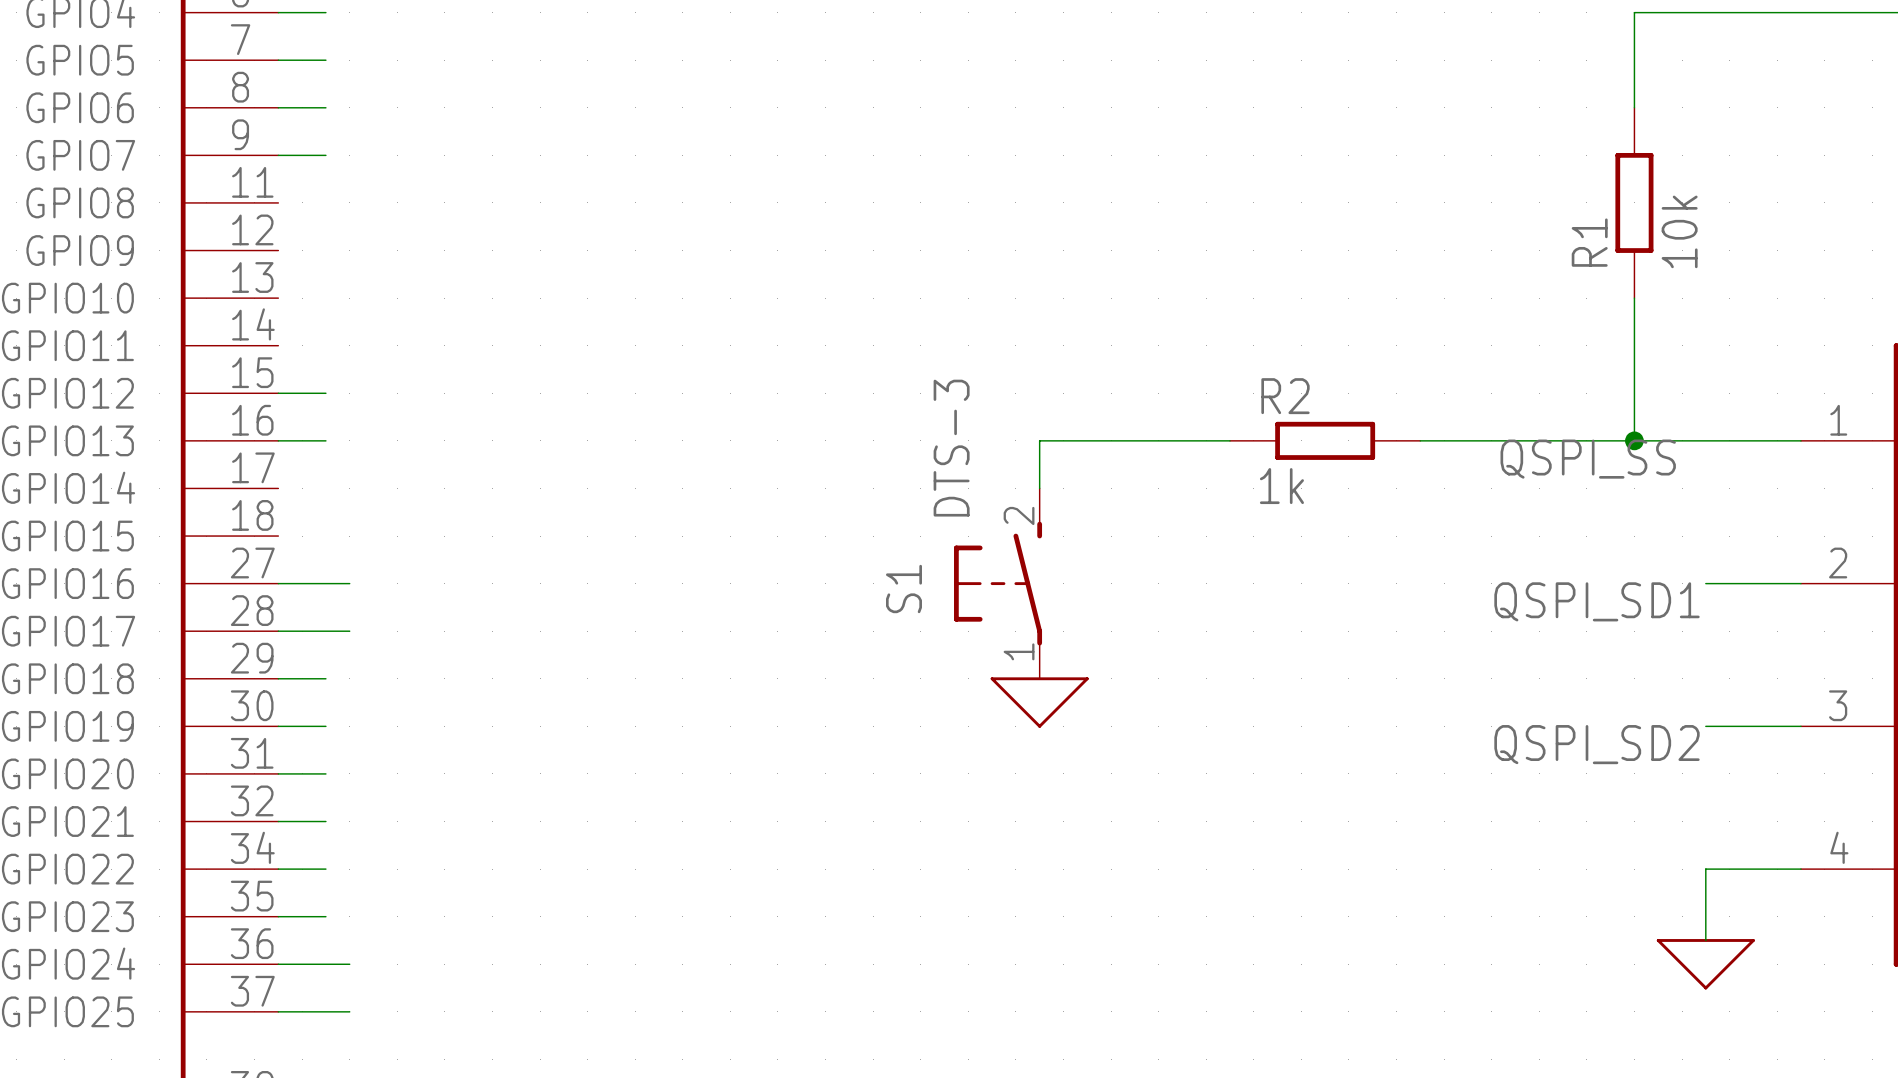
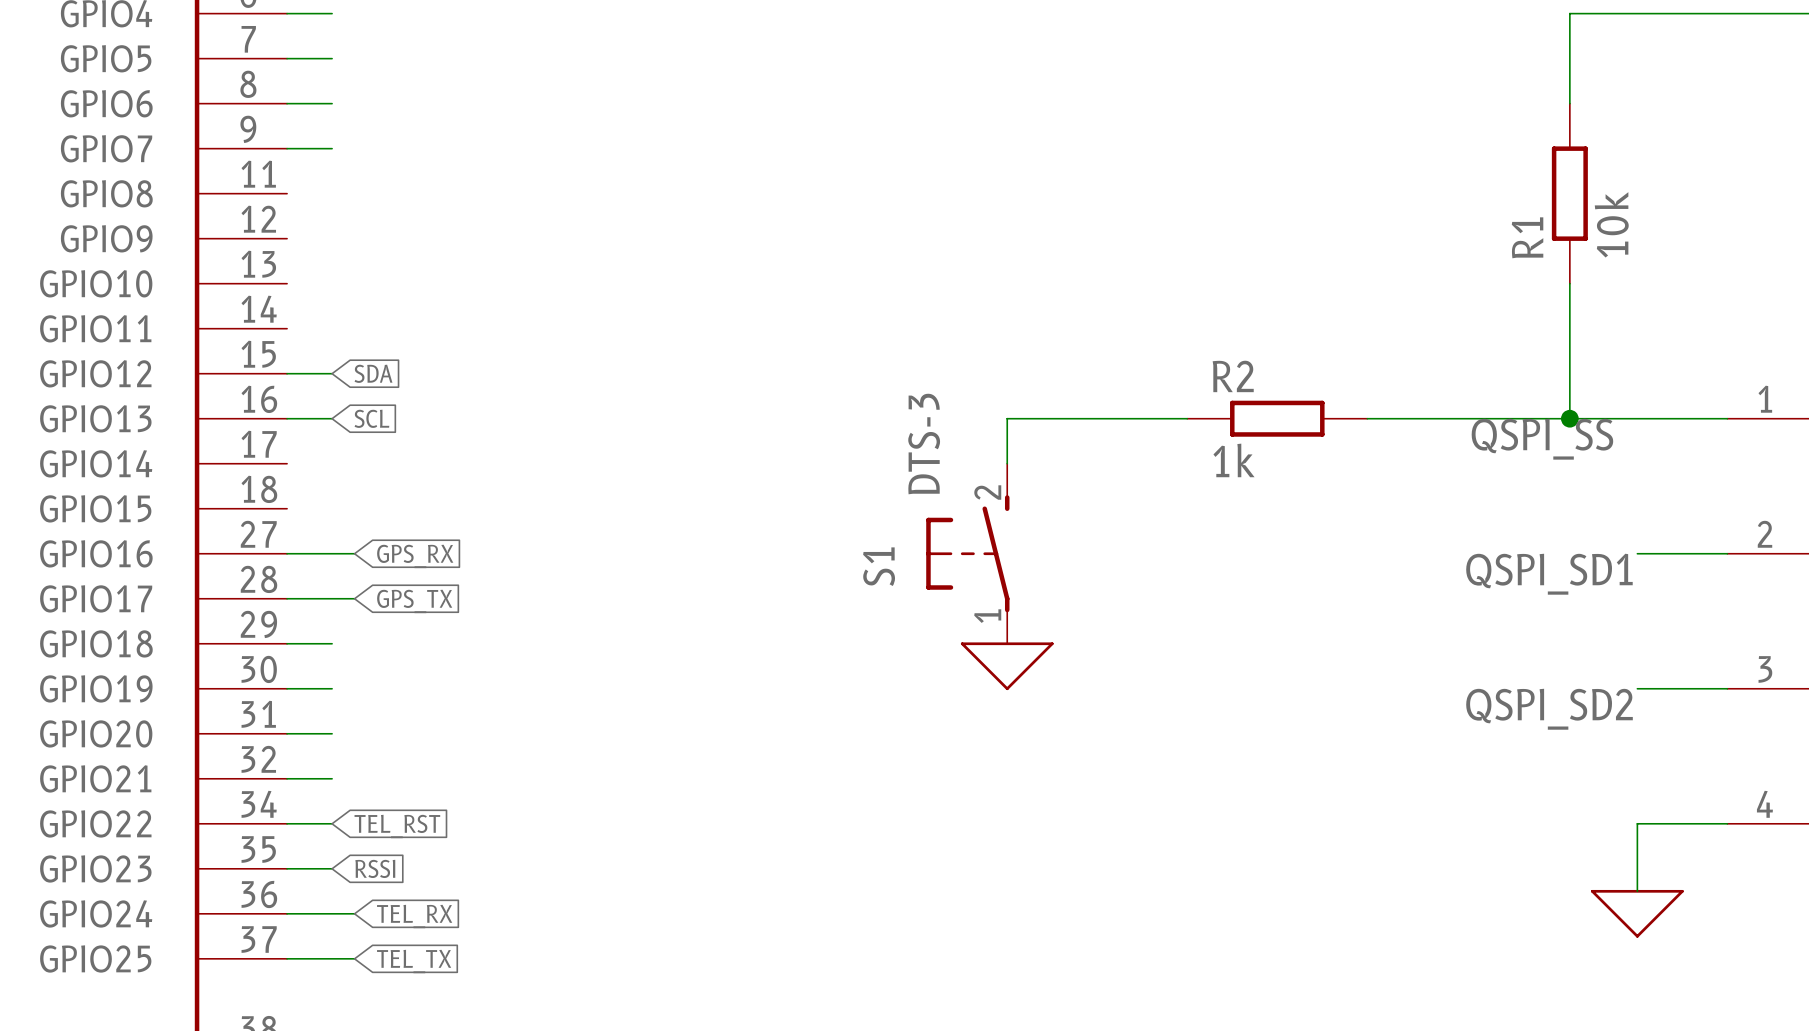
global label: none -> SDA (373, 373)
global label: none -> SCL (371, 418)
global label: none -> GPS_RX (415, 556)
global label: none -> GPS_TX (414, 601)
global label: none -> TEL_RST (397, 826)
global label: none -> RSSI (375, 868)
global label: none -> TEL_RX (414, 916)
global label: none -> TEL_TX (414, 961)

